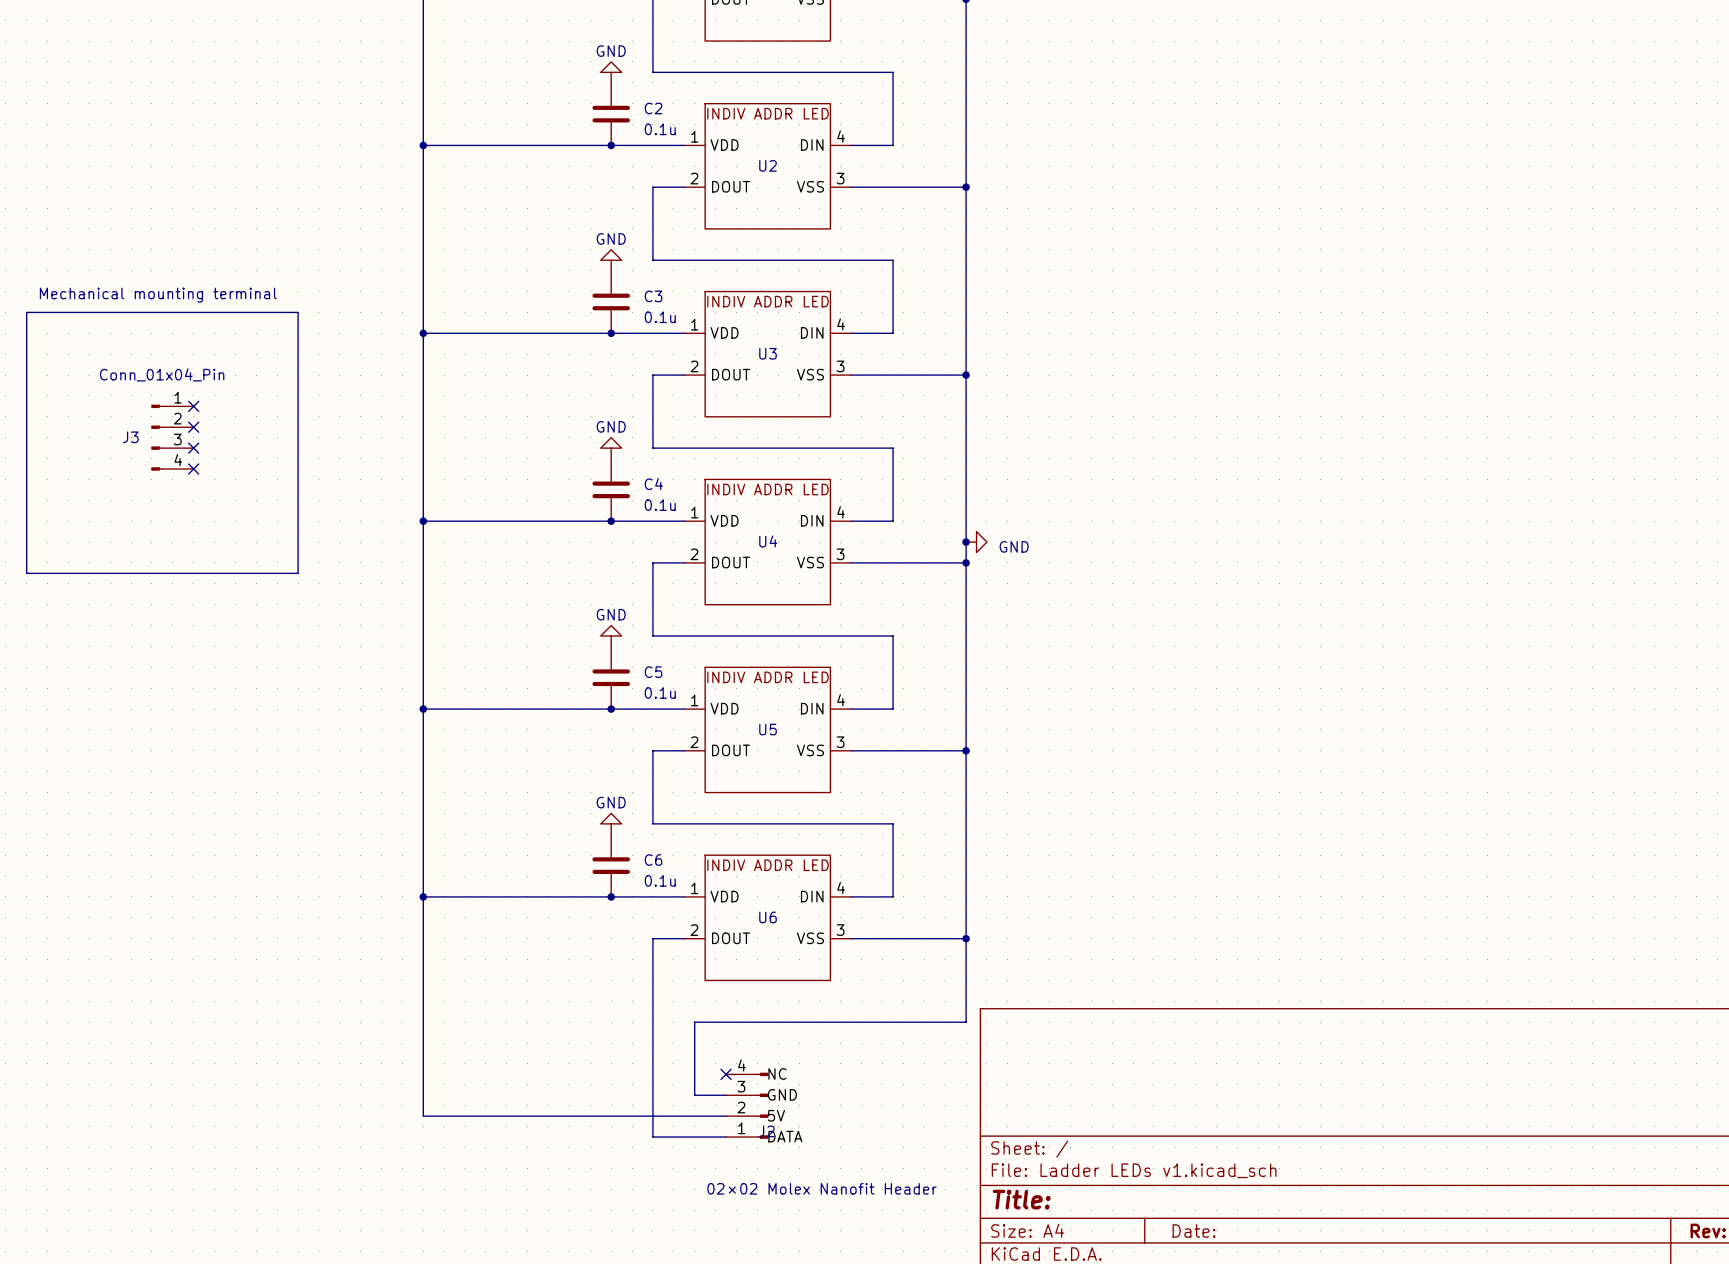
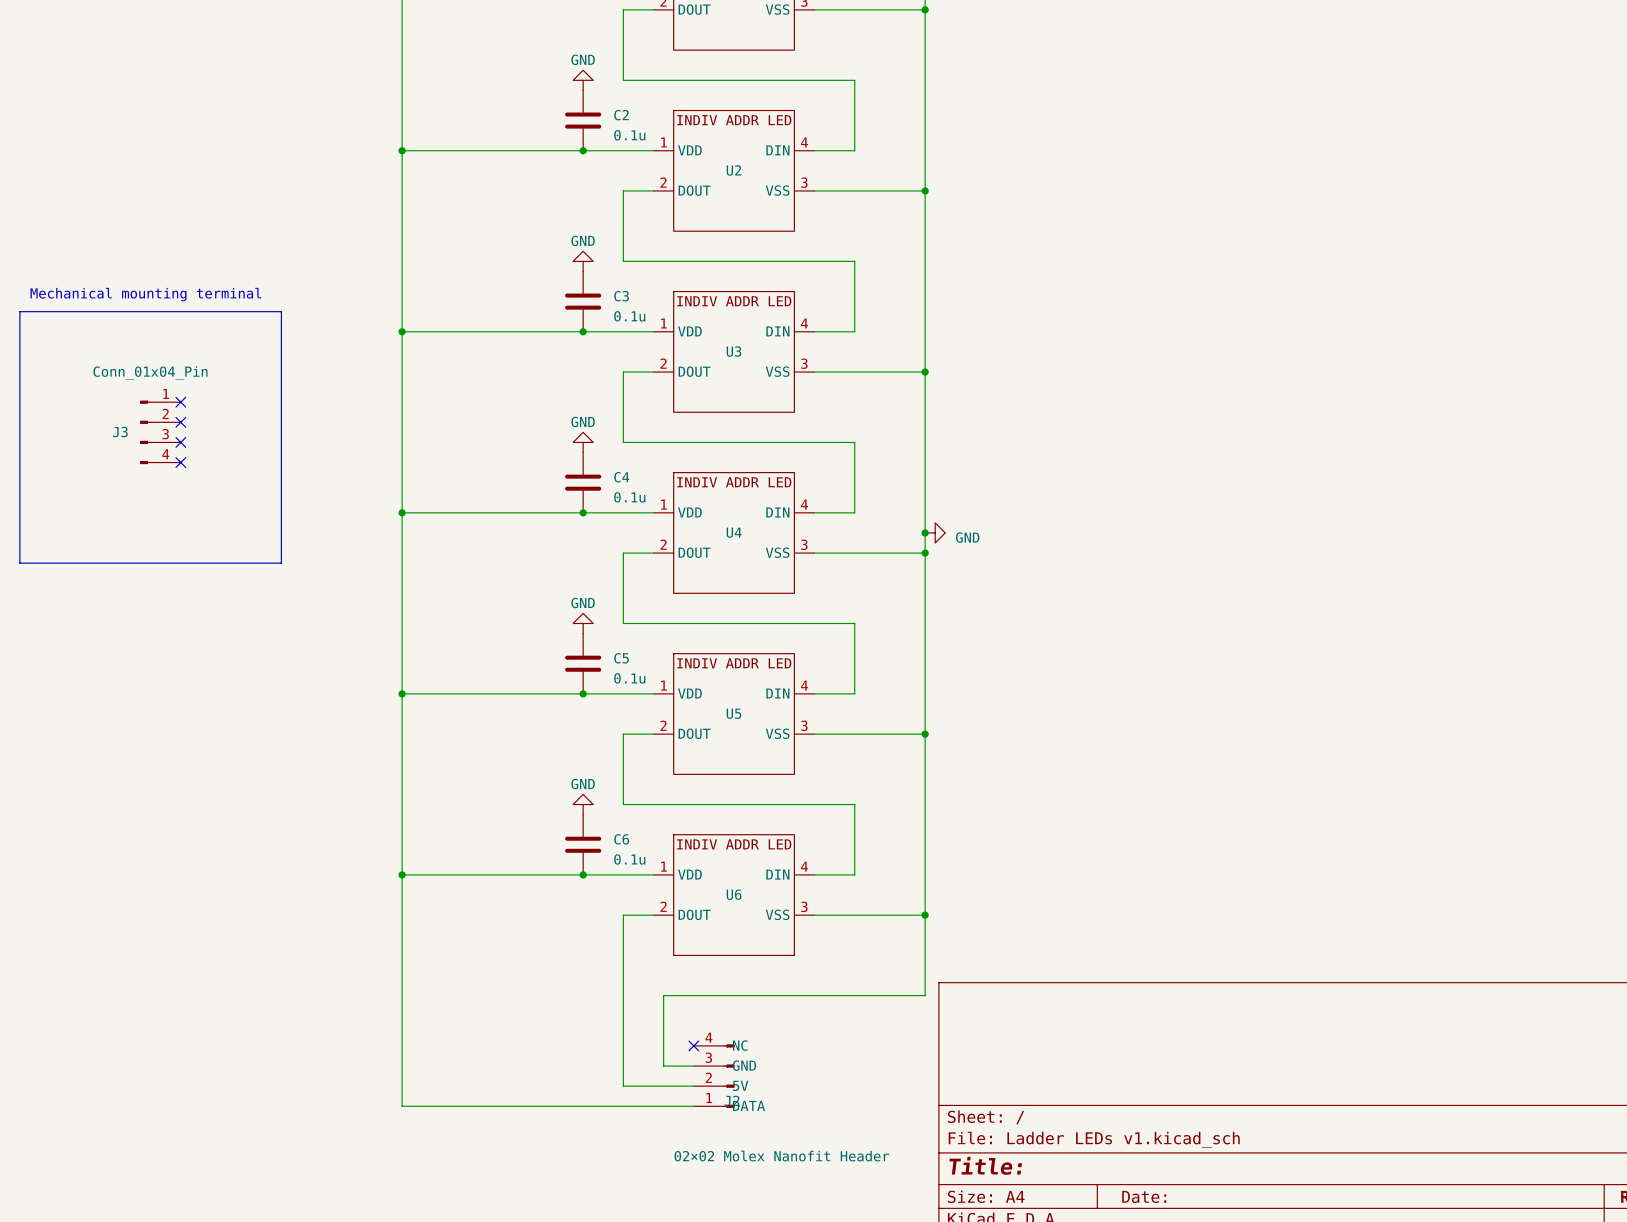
wire: (423, 1116) (652, 1116) (652, 1137) -> (402, 1086) (402, 1106) (623, 1106)

